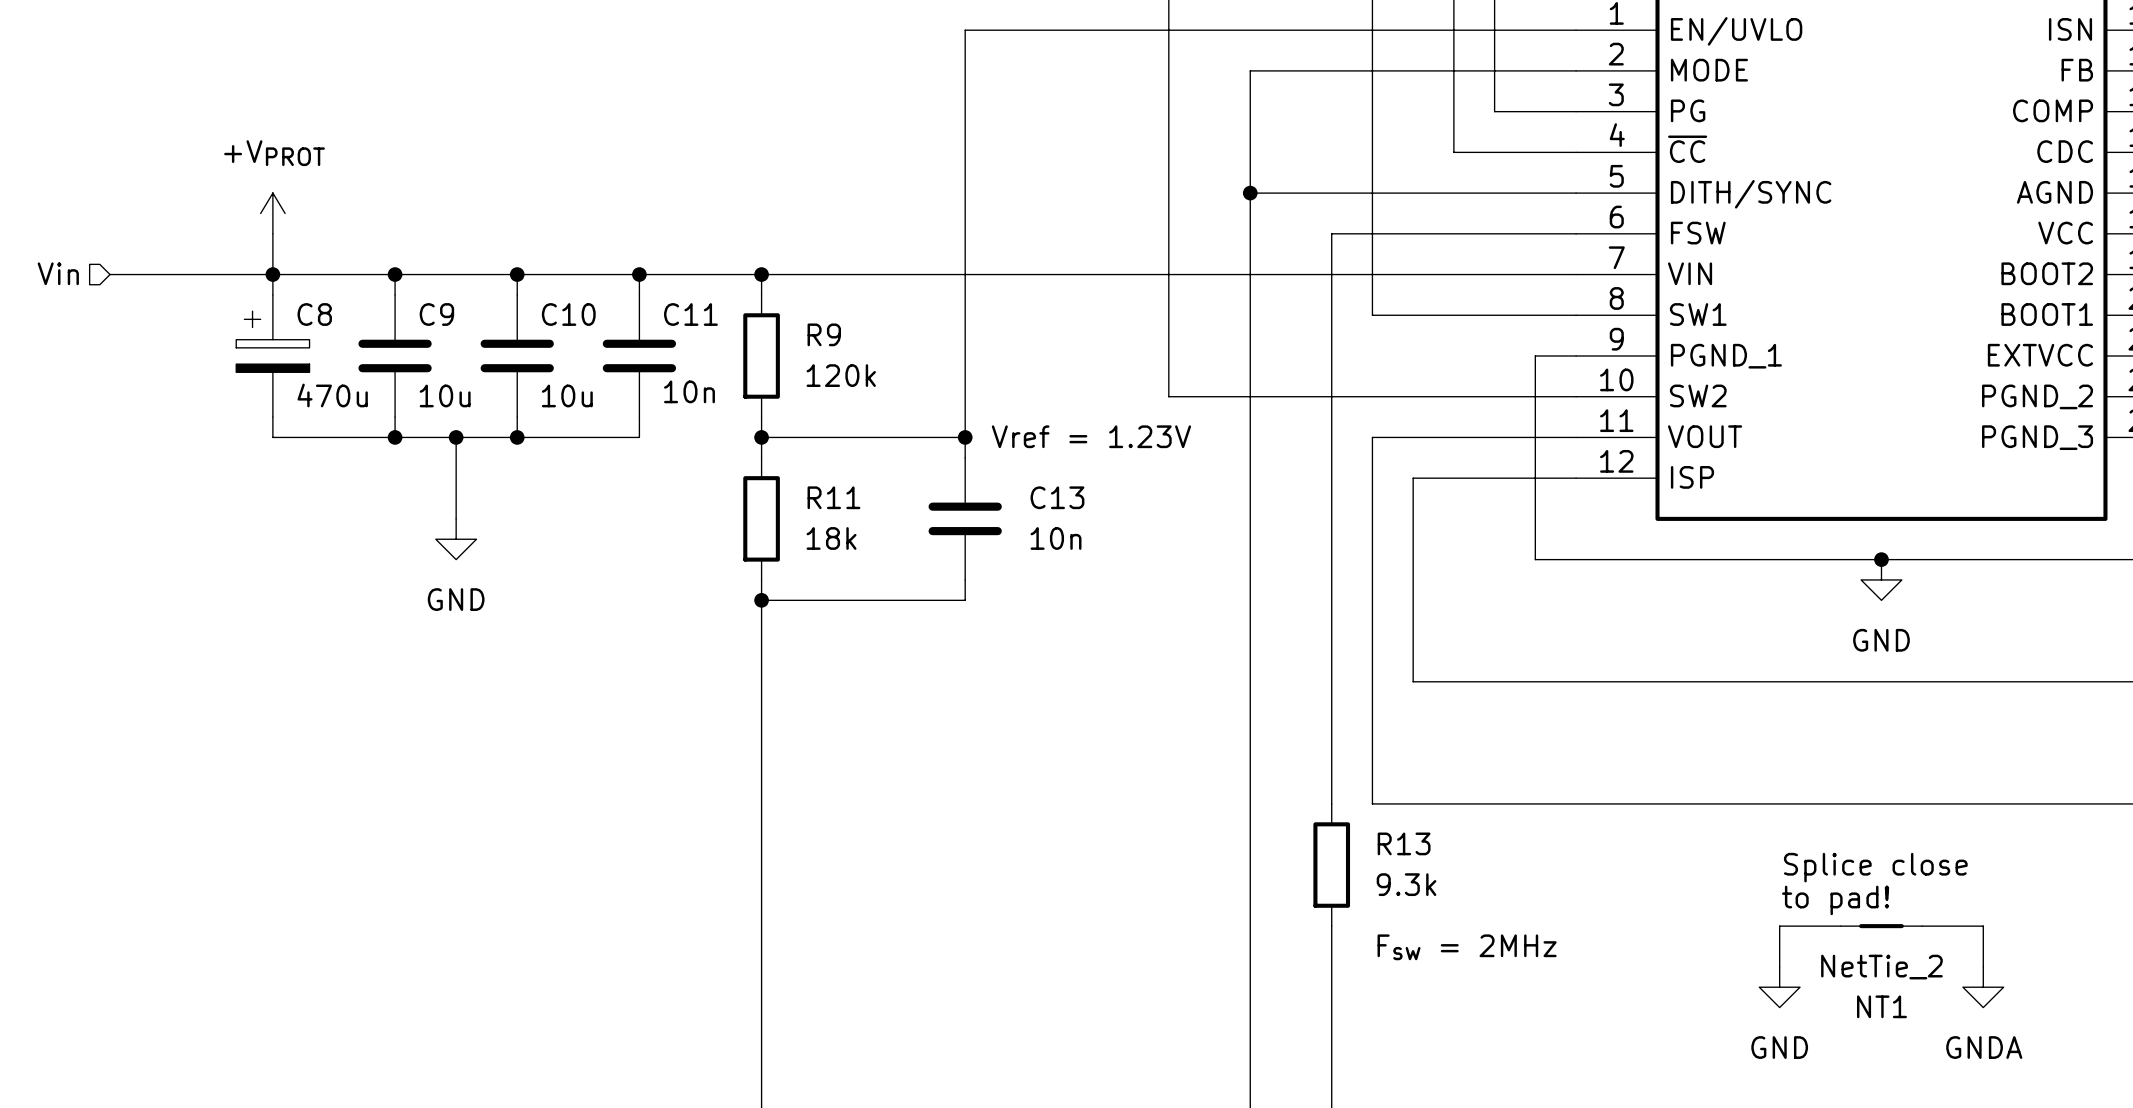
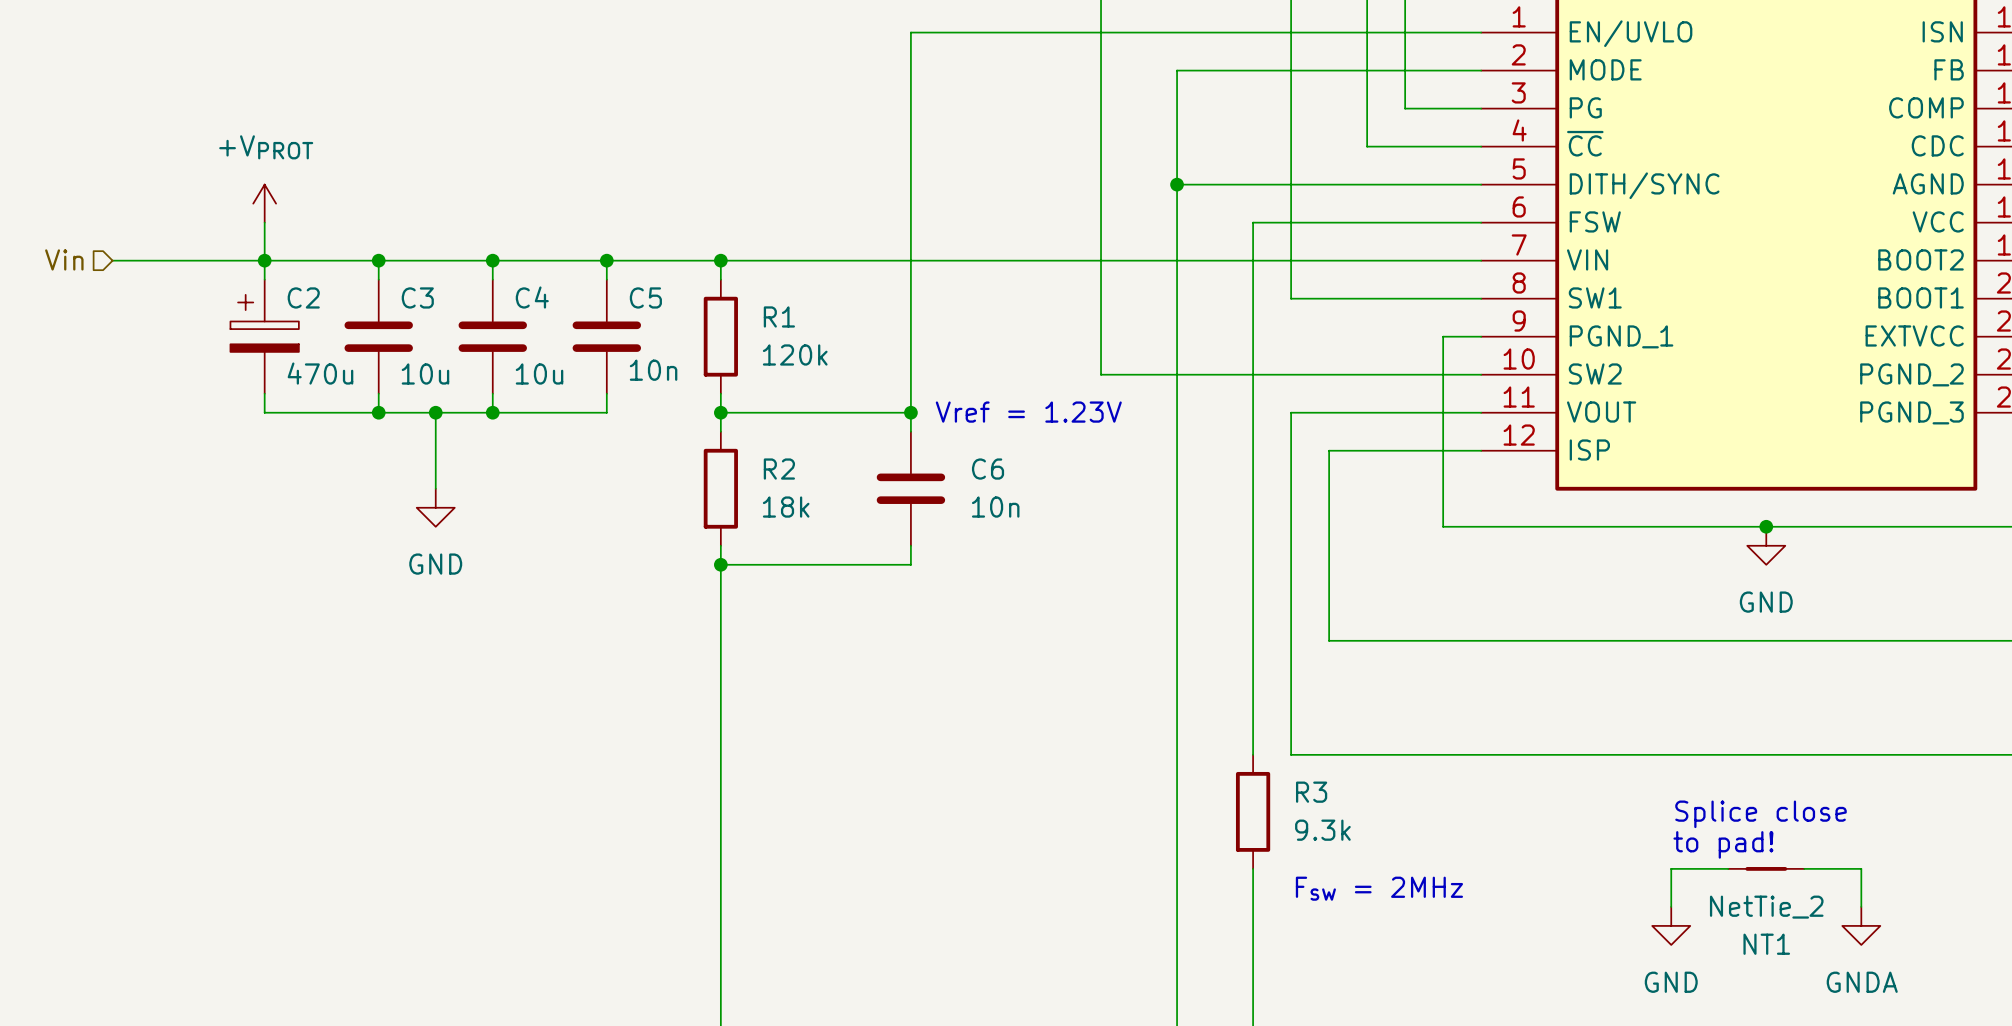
C8 name: C8 (314, 314) -> C2 (303, 297)
C9 name: C9 (436, 314) -> C3 (417, 297)
C10 name: C10 (568, 314) -> C4 (532, 297)
C11 name: C11 (690, 314) -> C5 (645, 297)
R9 name: R9 (824, 334) -> R1 (779, 316)
R11 name: R11 (833, 497) -> R2 (779, 469)
C13 name: C13 (1057, 497) -> C6 (988, 469)
R13 name: R13 (1404, 843) -> R3 (1311, 792)

